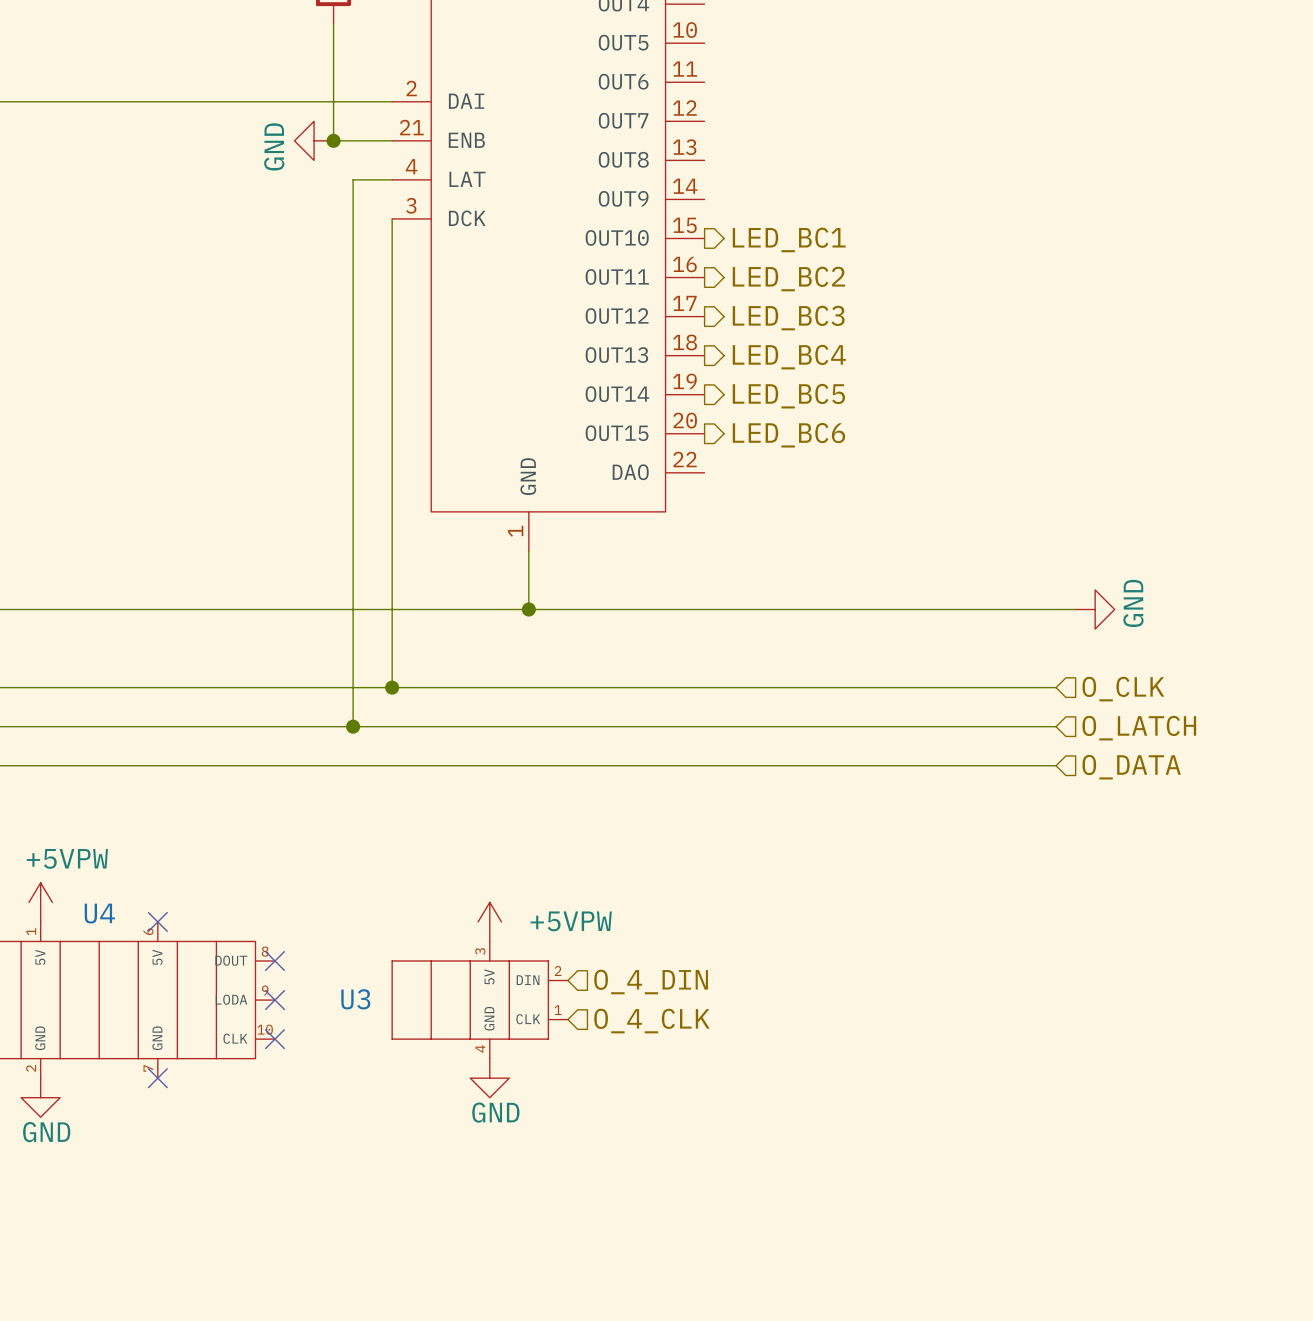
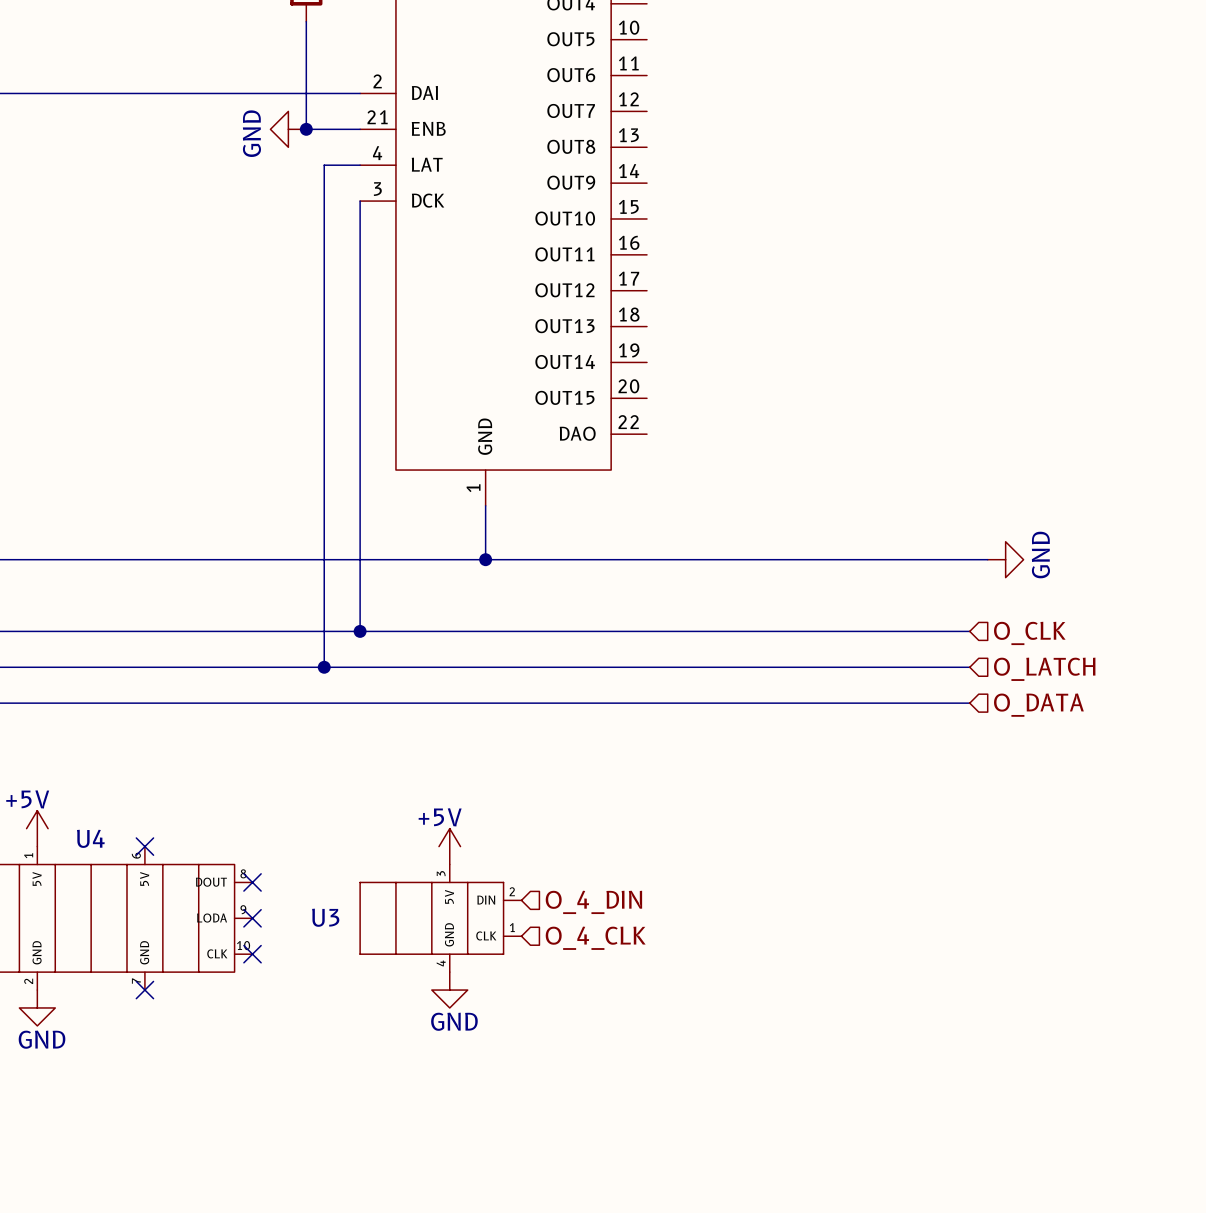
hierarchical label: LED_BC1 (789, 239) -> none
hierarchical label: LED_BC2 (788, 279) -> none
hierarchical label: LED_BC3 (788, 318) -> none
hierarchical label: LED_BC4 (789, 357) -> none
hierarchical label: LED_BC5 (788, 396) -> none
hierarchical label: LED_BC6 (788, 435) -> none
power symbol: +5VPW (40, 902) -> +5V (37, 828)
power symbol: +5VPW (489, 921) -> +5V (449, 846)

